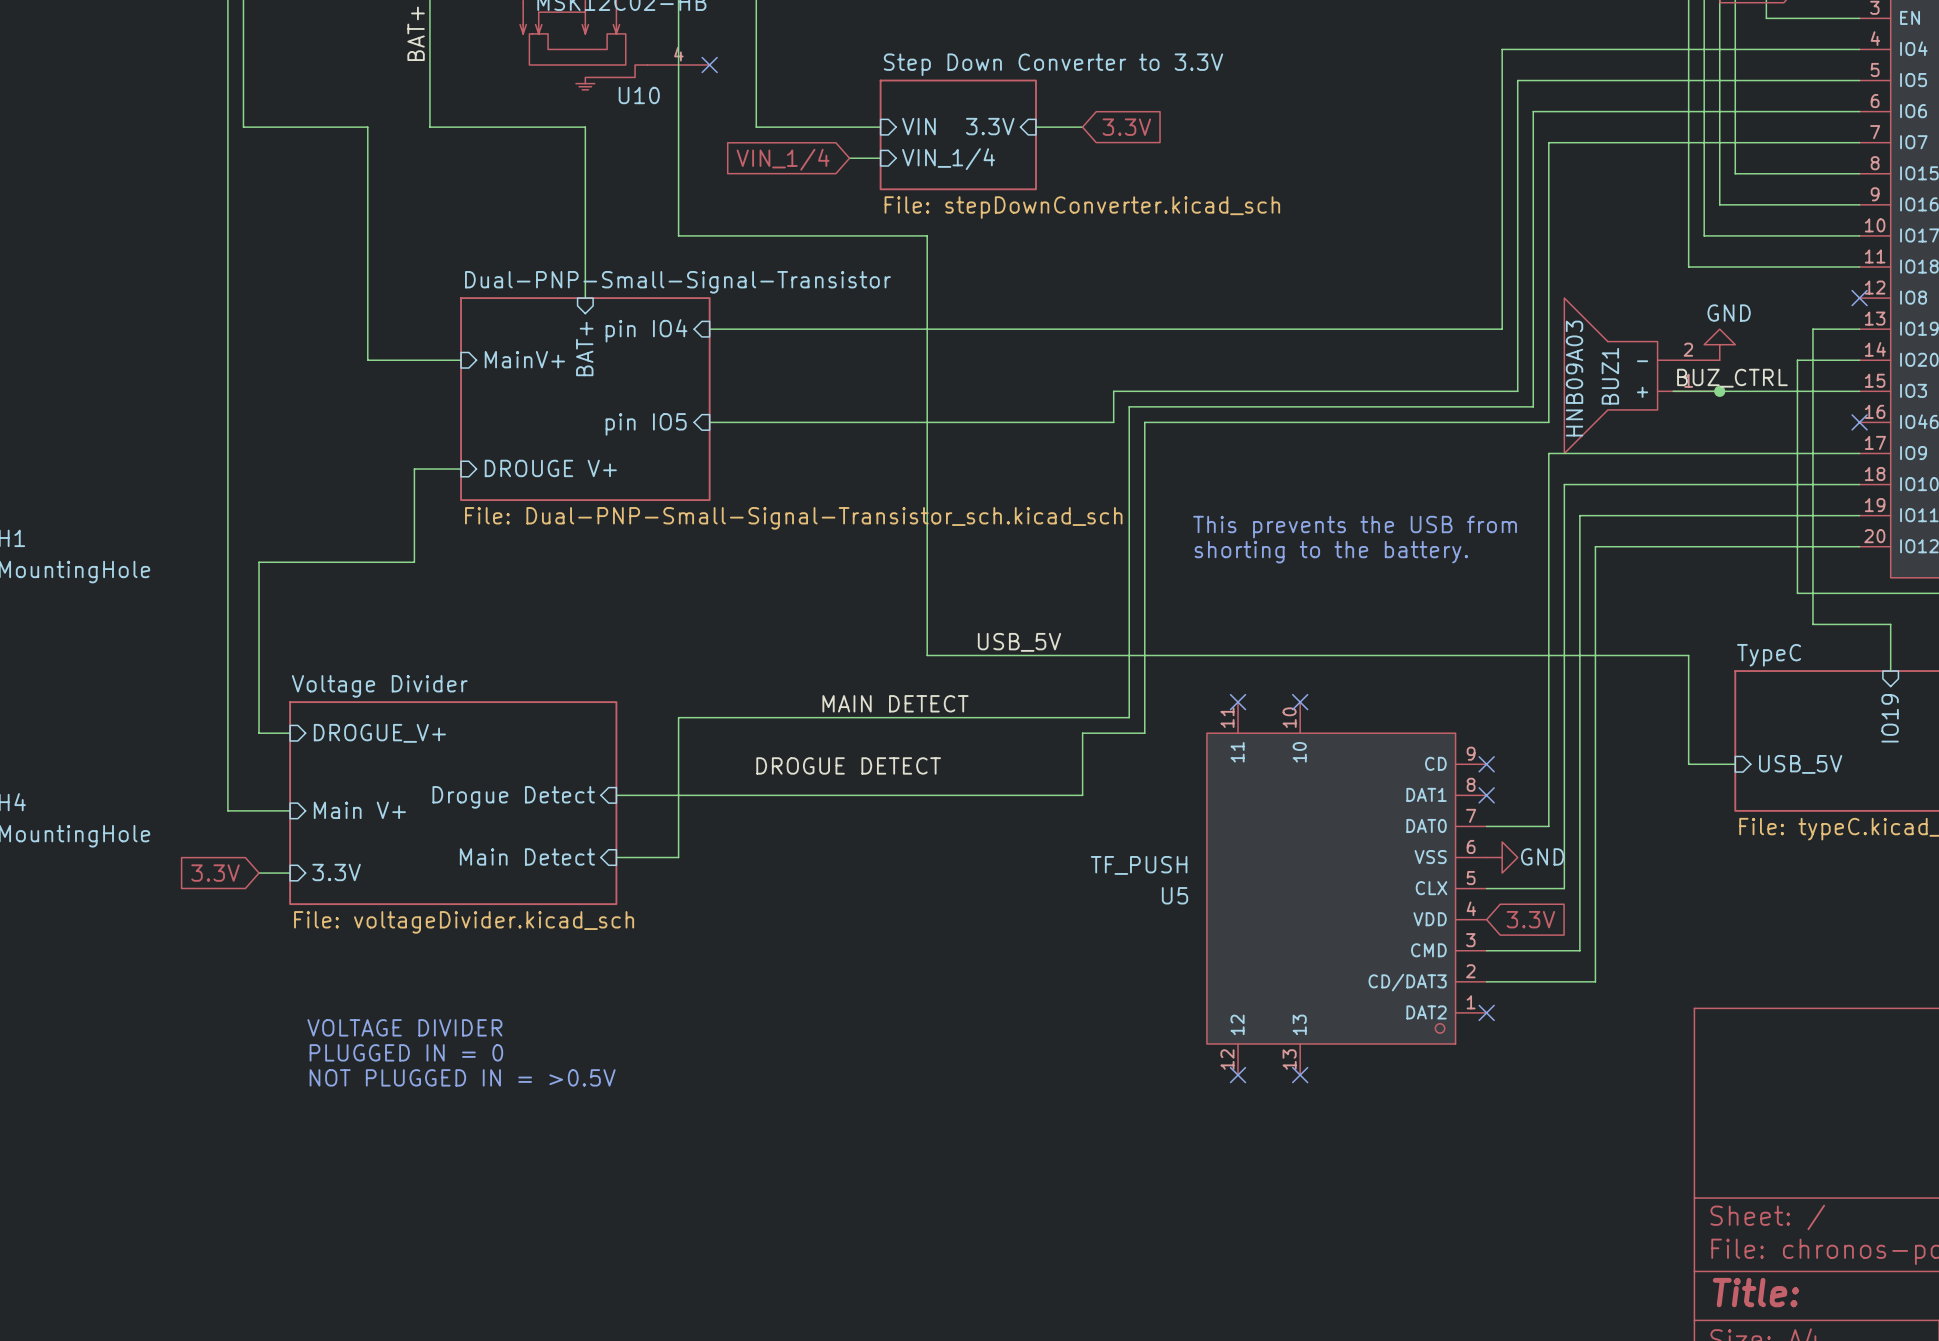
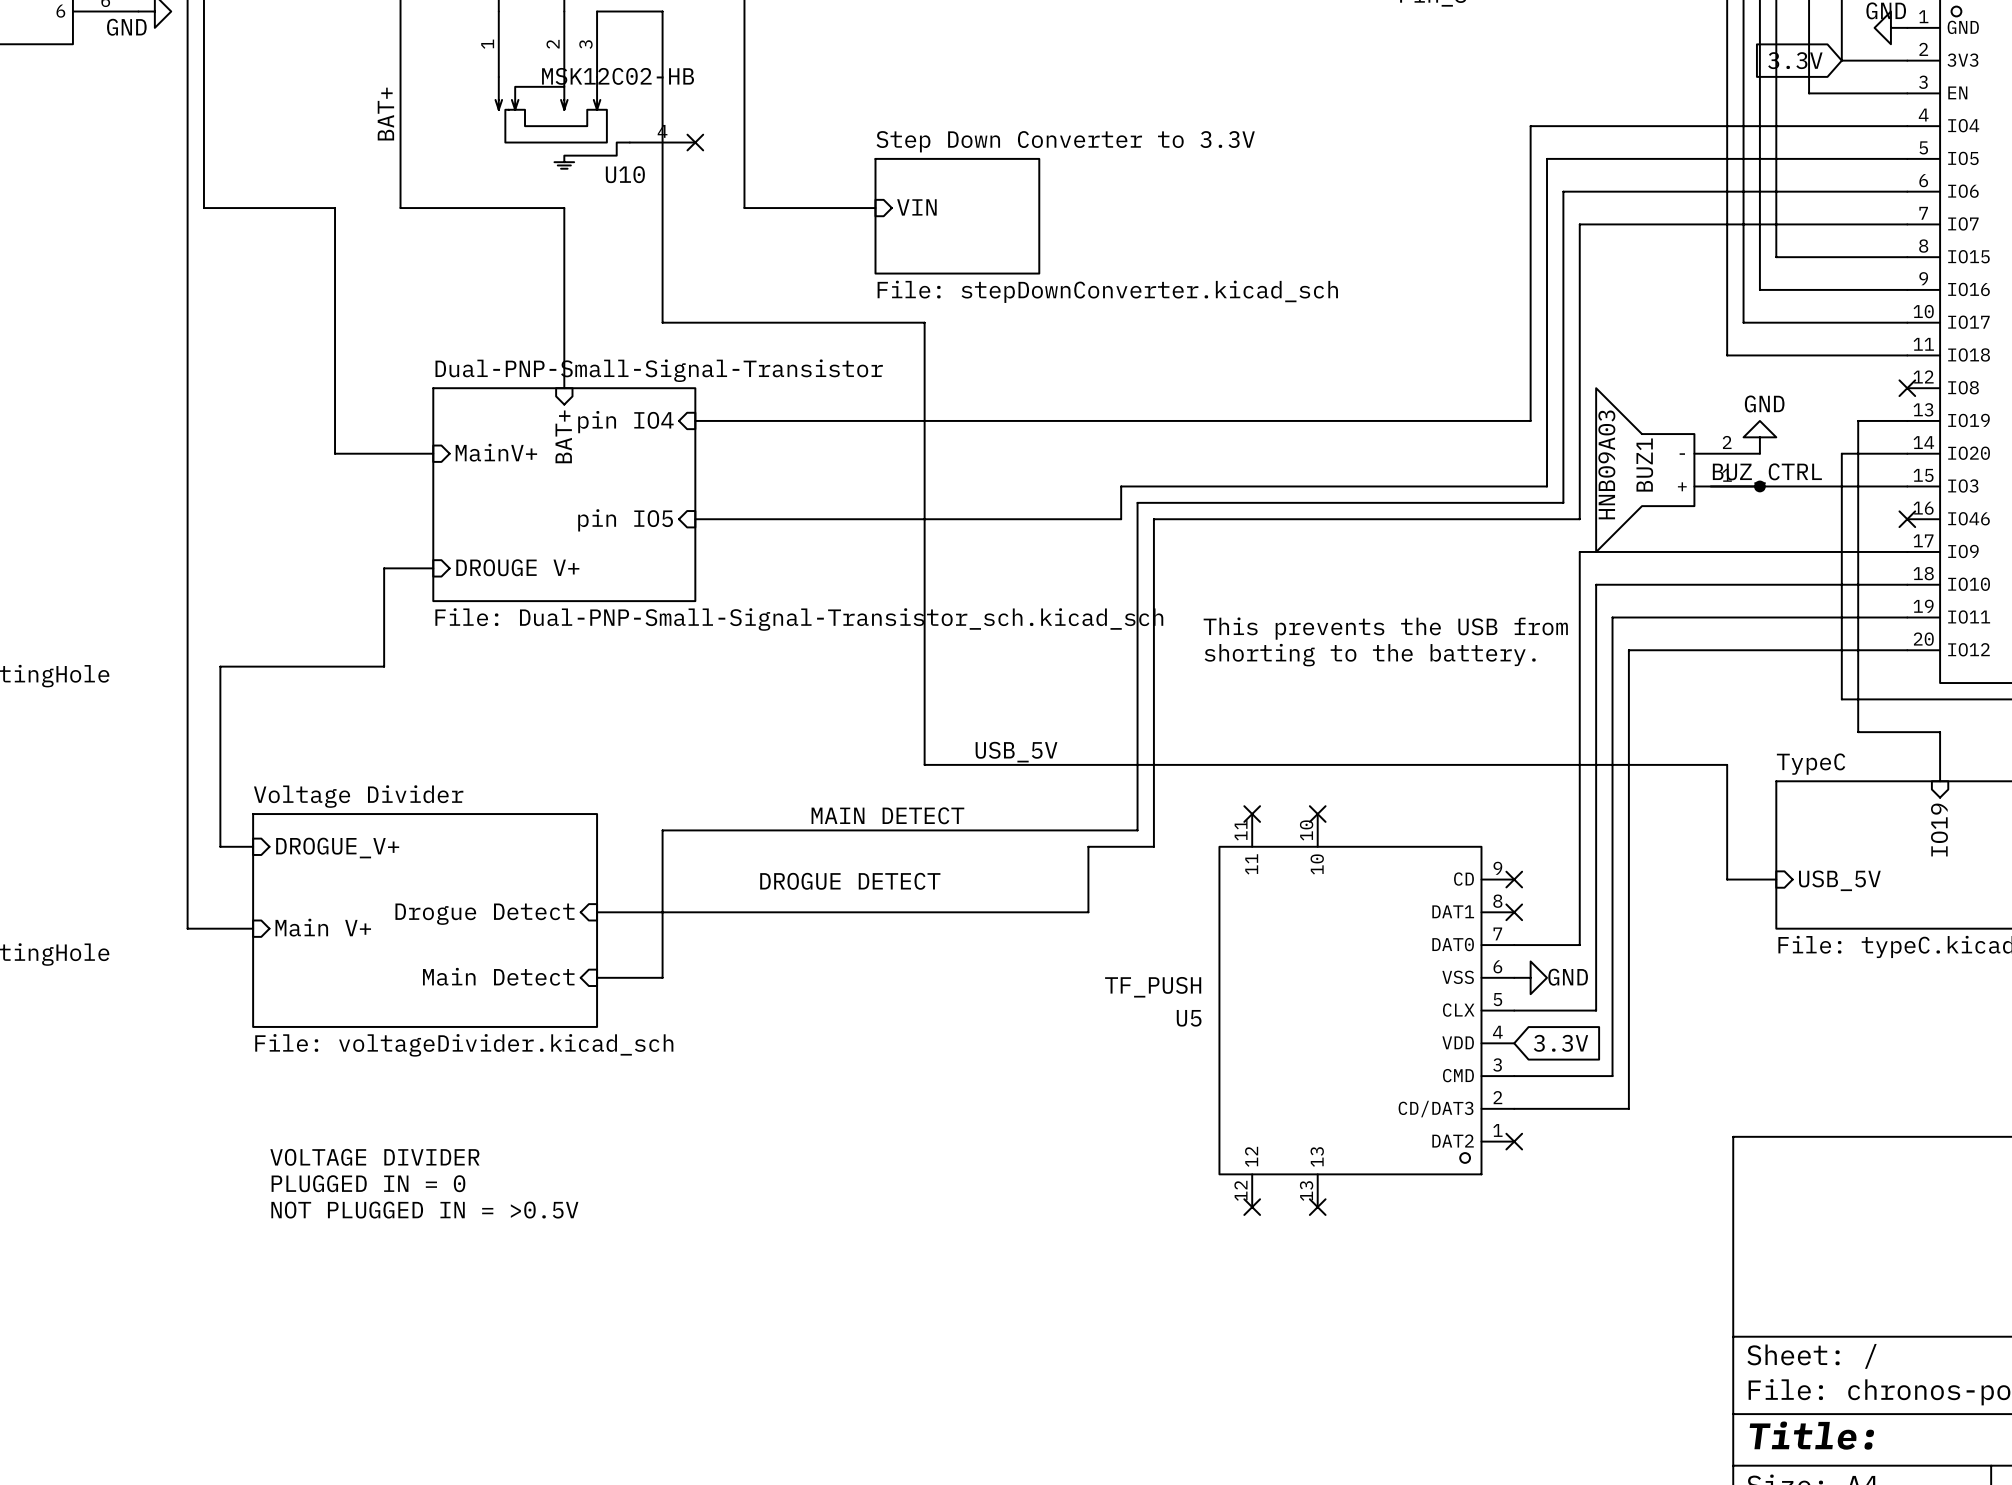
sheet pin: 3.3V (990, 126) -> none
wire: (1035, 127) (1082, 127) -> none
global label: 3.3V (1126, 127) -> none
wire: (849, 158) (880, 158) -> none
global label: VIN_1/4 (783, 159) -> none
sheet pin: VIN_1/4 (948, 159) -> none
sheet pin: 3.3V (336, 872) -> none
global label: 3.3V (215, 873) -> none
wire: (259, 873) (290, 873) -> none

